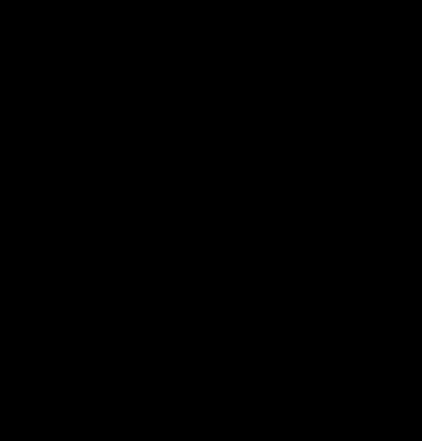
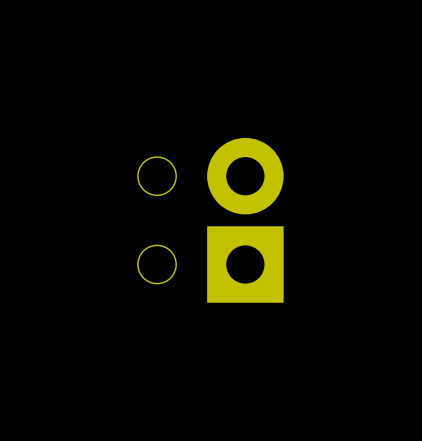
part: none -> (210, 220)

